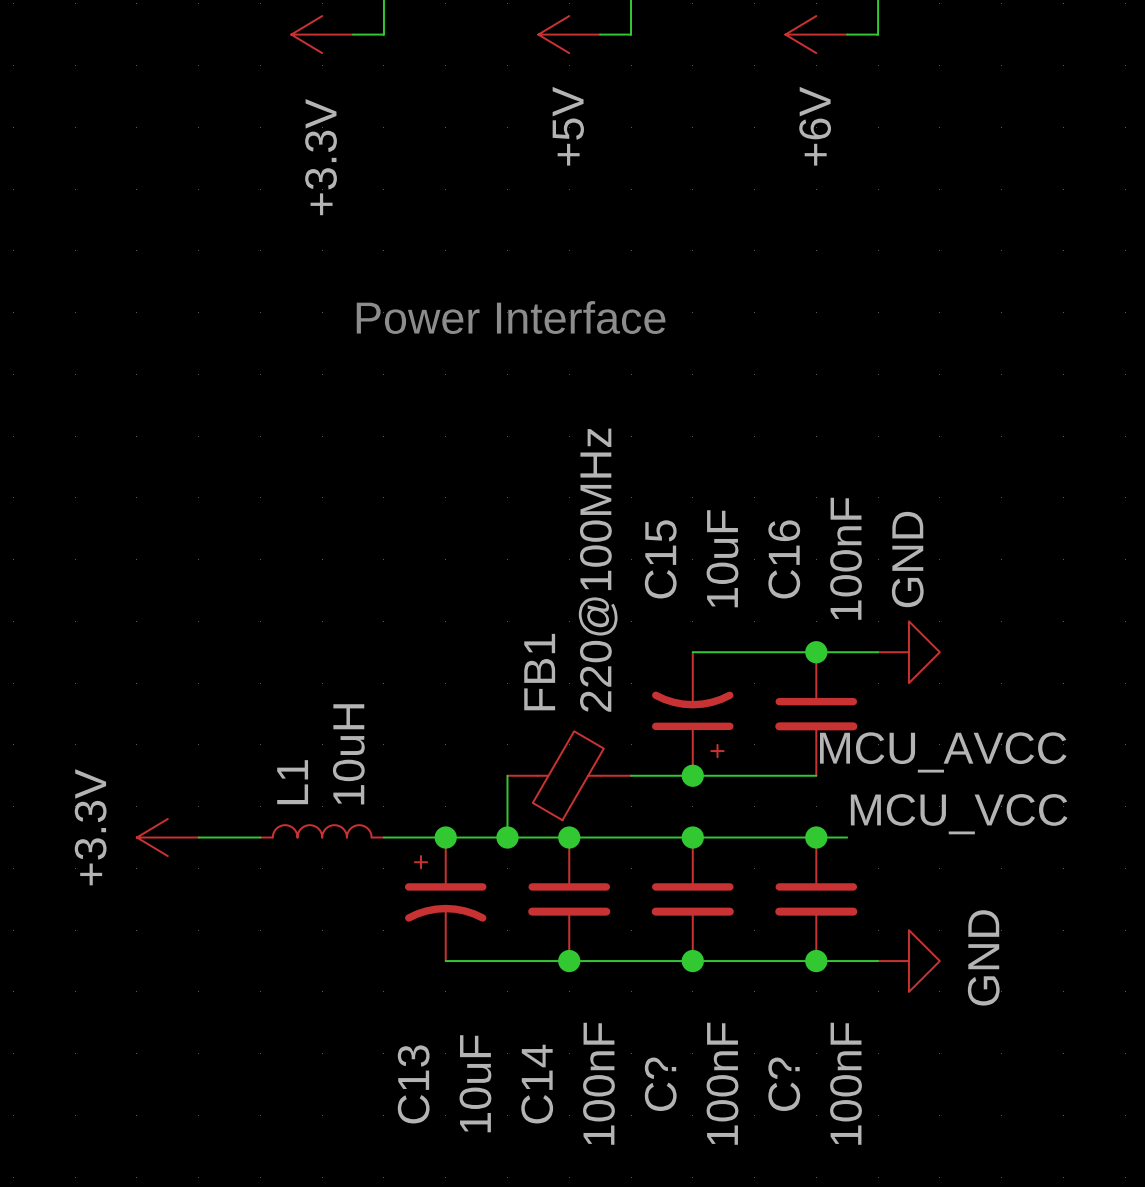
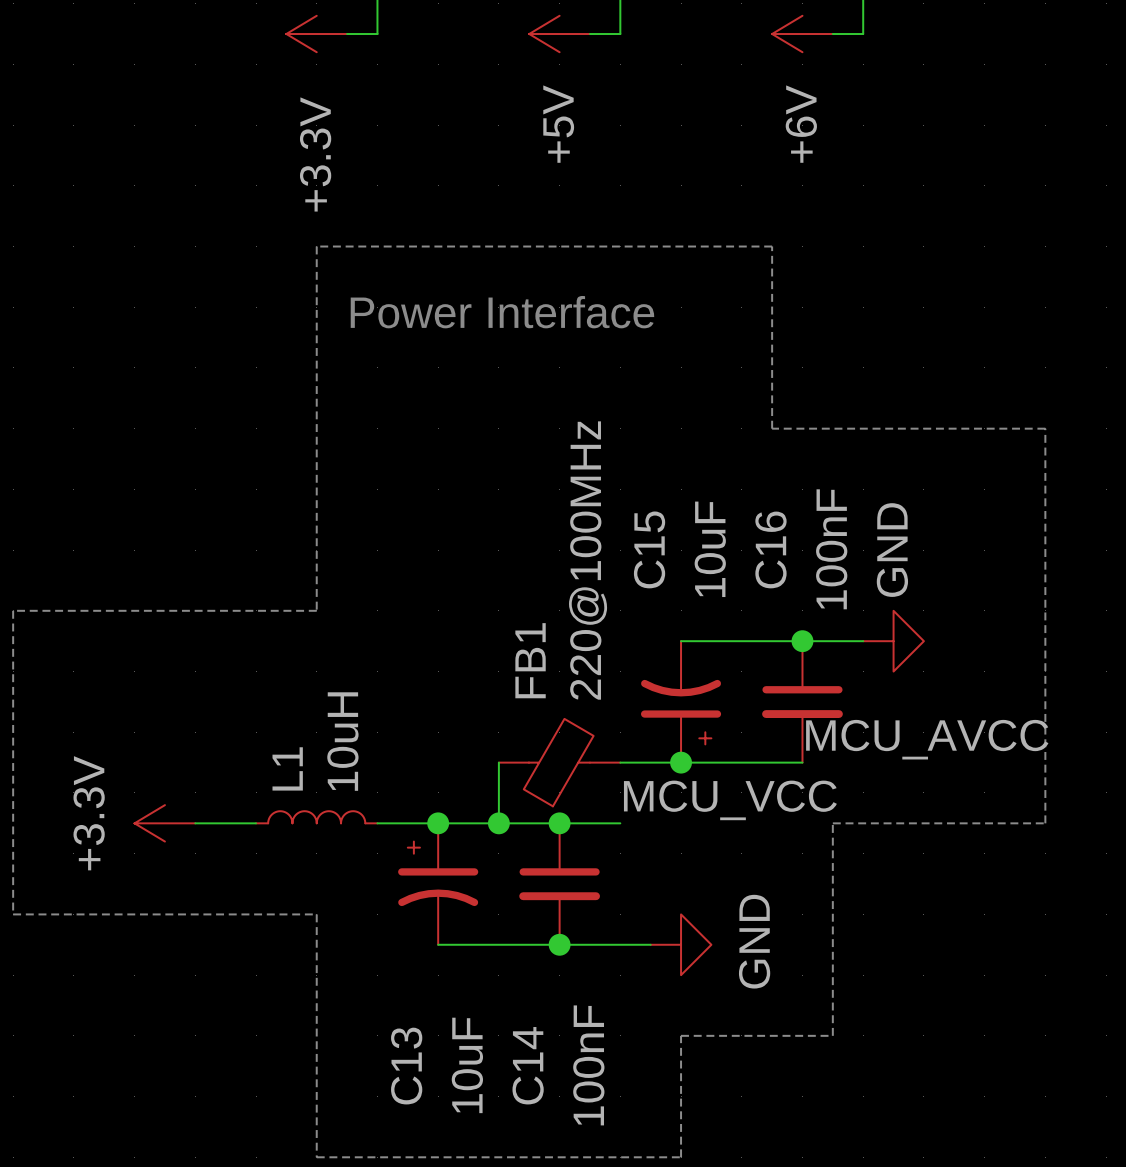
line: none -> (316, 246) (316, 610) (13, 610) (13, 914) (316, 914) (316, 1157) (681, 1157) (681, 1035) (832, 1035) (832, 823) (1045, 823) (1045, 428) (772, 428) (772, 246) (316, 246)
label position: MCU_VCC (959, 814) -> MCU_VCC (730, 800)
wire: (631, 837) (847, 837) -> none
junction: (692, 837) -> none
junction: (816, 837) -> none
C?: 100nF (692, 899) -> none
C?: 100nF (816, 899) -> none
wire: (661, 961) (878, 961) -> none
junction: (692, 961) -> none
junction: (816, 961) -> none
power symbol position: GND (908, 961) -> GND (681, 944)

